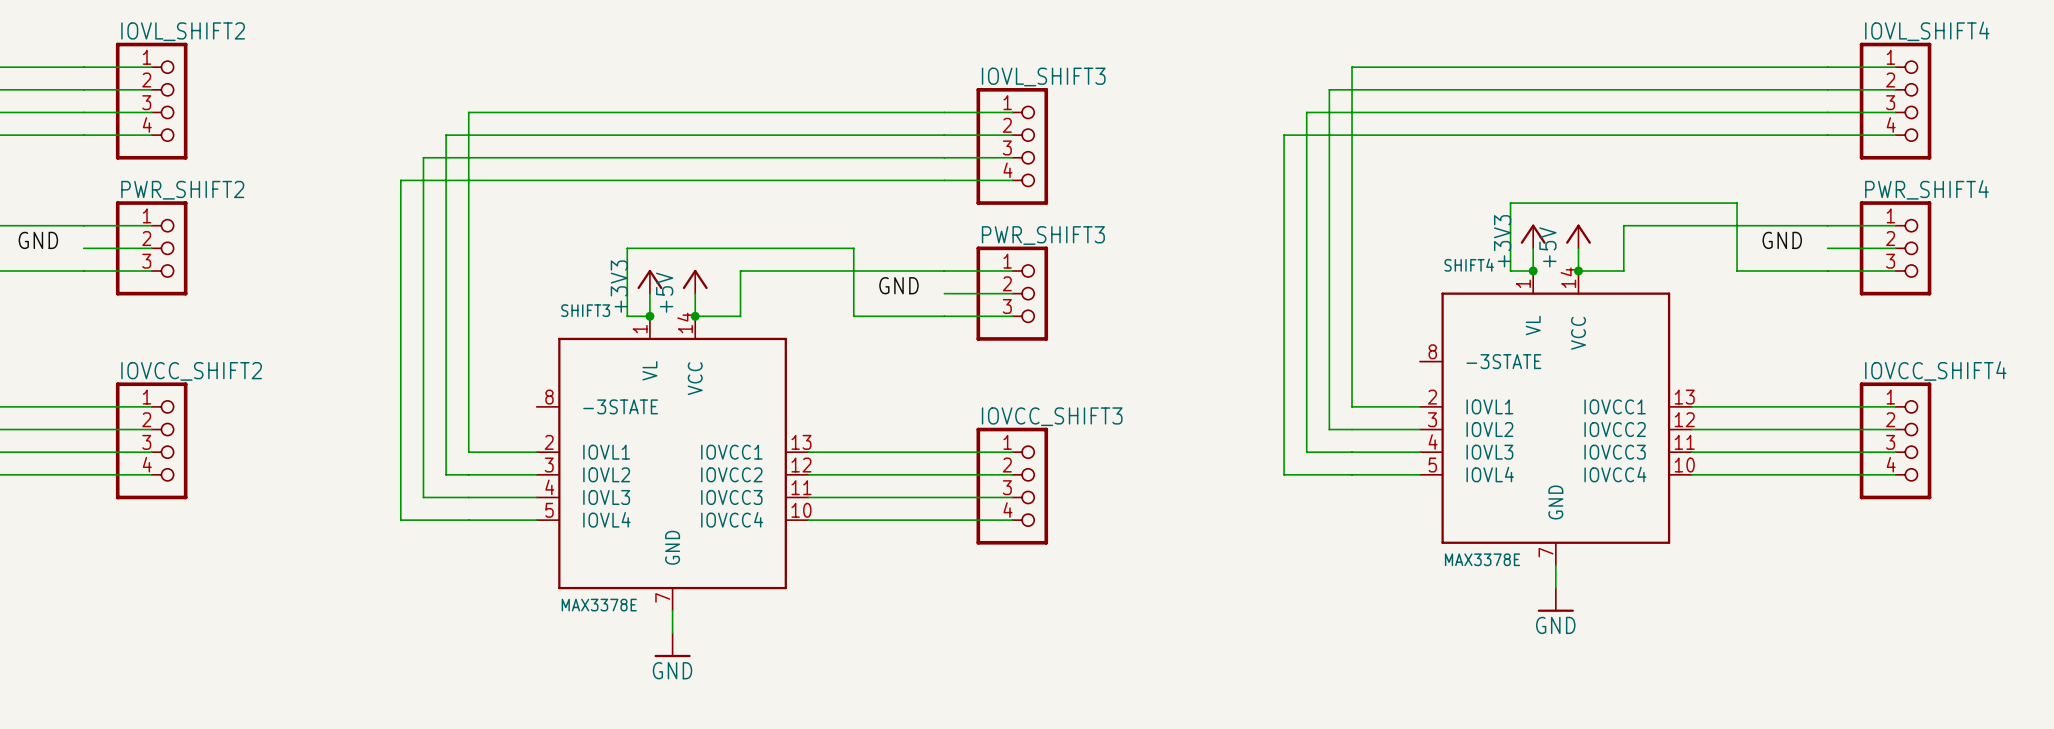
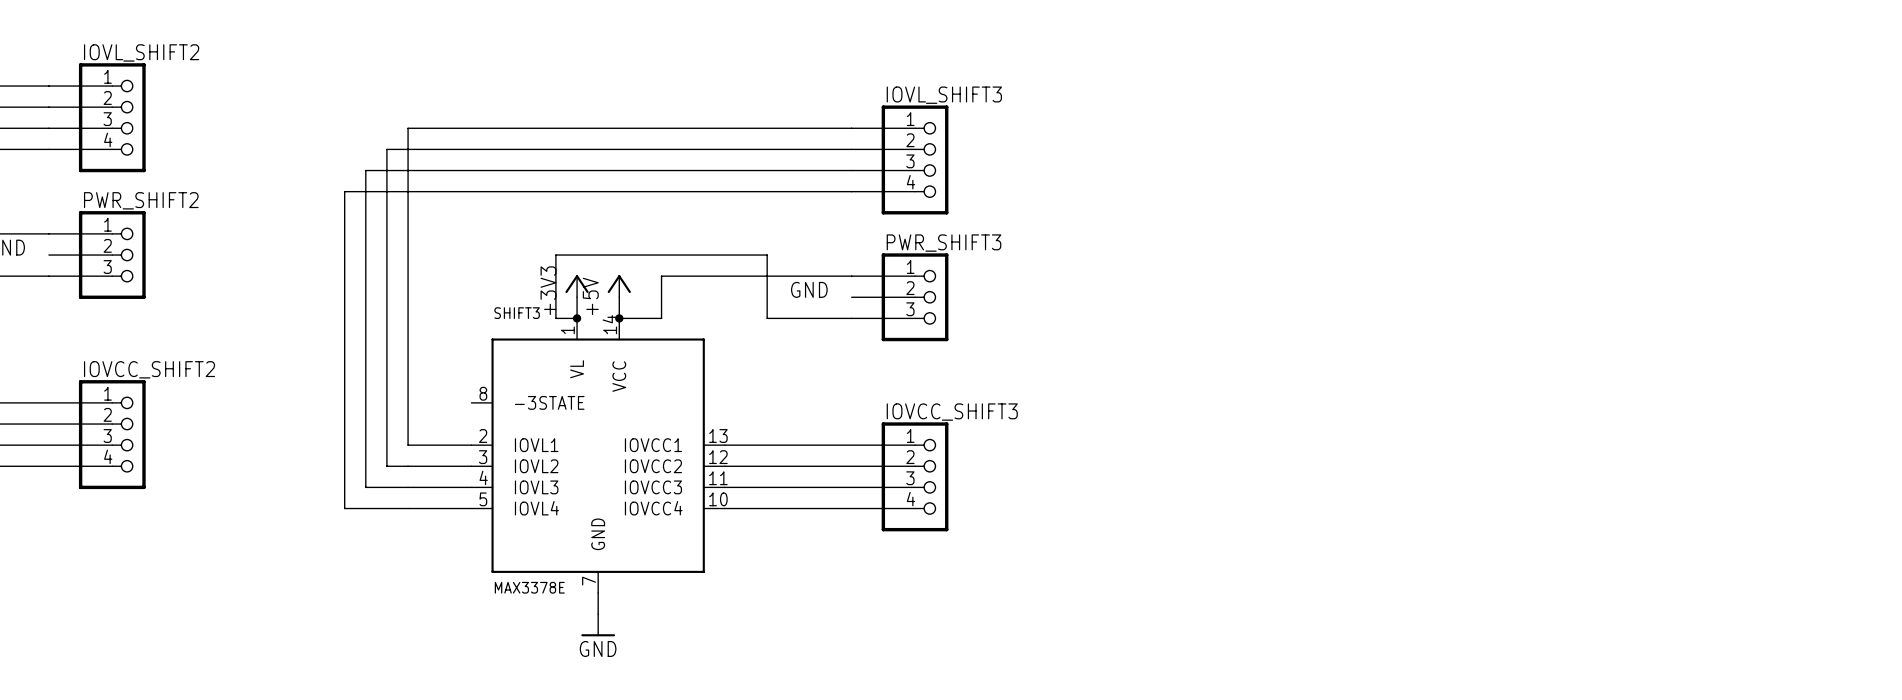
wire: (1895, 67) (1352, 67) (1352, 406) (1419, 406) -> none
wire: (1895, 89) (1329, 89) (1329, 429) (1419, 429) -> none
IOVL_SHIFT4: (1895, 101) -> none
wire: (1895, 112) (1306, 112) (1306, 452) (1419, 452) -> none
wire: (1895, 135) (1284, 135) (1284, 474) (1419, 474) -> none
wire: (1895, 225) (1623, 225) (1623, 271) (1578, 271) (1578, 248) -> none
power symbol: +3V3 (1533, 236) -> none
power symbol: +5V (1578, 236) -> none
label: GND (1782, 240) -> none
wire: (1533, 248) (1533, 271) (1510, 271) (1510, 203) (1737, 203) (1737, 271) (1895, 271) -> none
wire: (1827, 248) (1895, 248) -> none
PWR_SHIFT4: (1895, 248) -> none
junction: (1533, 271) -> none
junction: (1578, 271) -> none
wire: (1691, 406) (1895, 406) -> none
SHIFT4: MAX3378E (1555, 418) -> none
wire: (1691, 429) (1895, 429) -> none
IOVCC_SHIFT4: (1895, 440) -> none
wire: (1691, 452) (1895, 452) -> none
wire: (1691, 474) (1895, 474) -> none
wire: (1555, 565) (1555, 588) -> none
power symbol: GND (1555, 599) -> none

